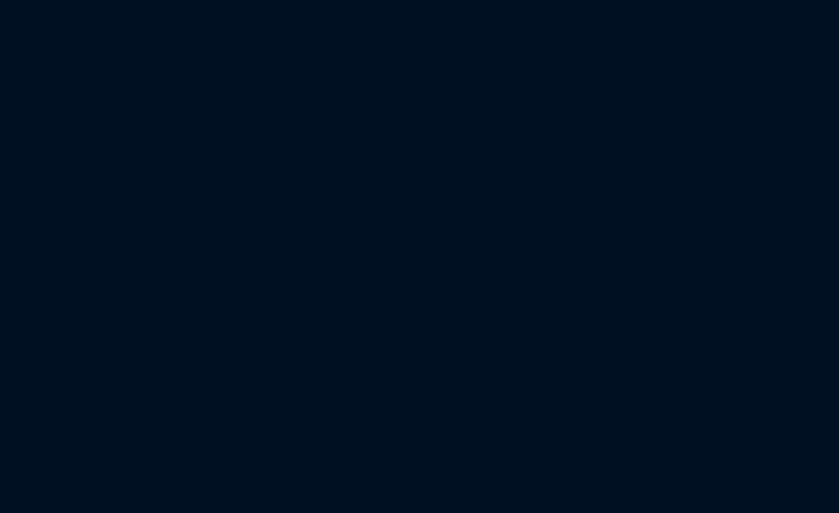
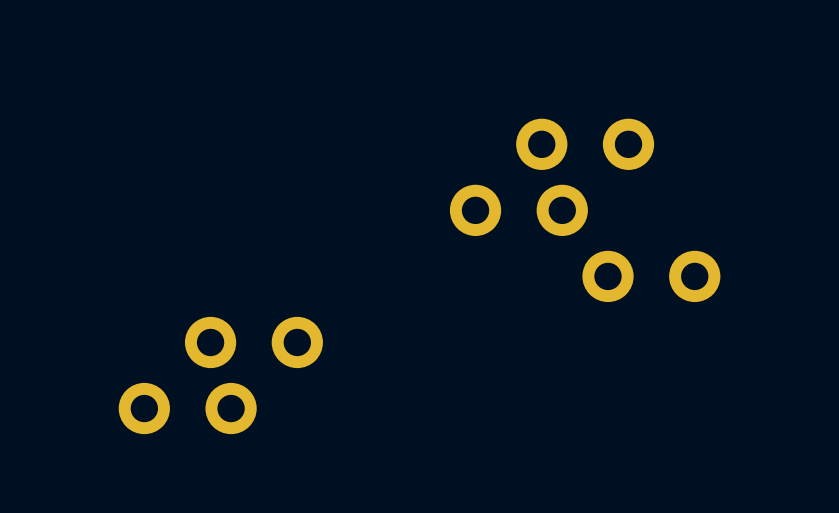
part: none -> (585, 144)
part: none -> (518, 210)
part: none -> (651, 276)
part: none -> (253, 342)
part: none -> (187, 408)

